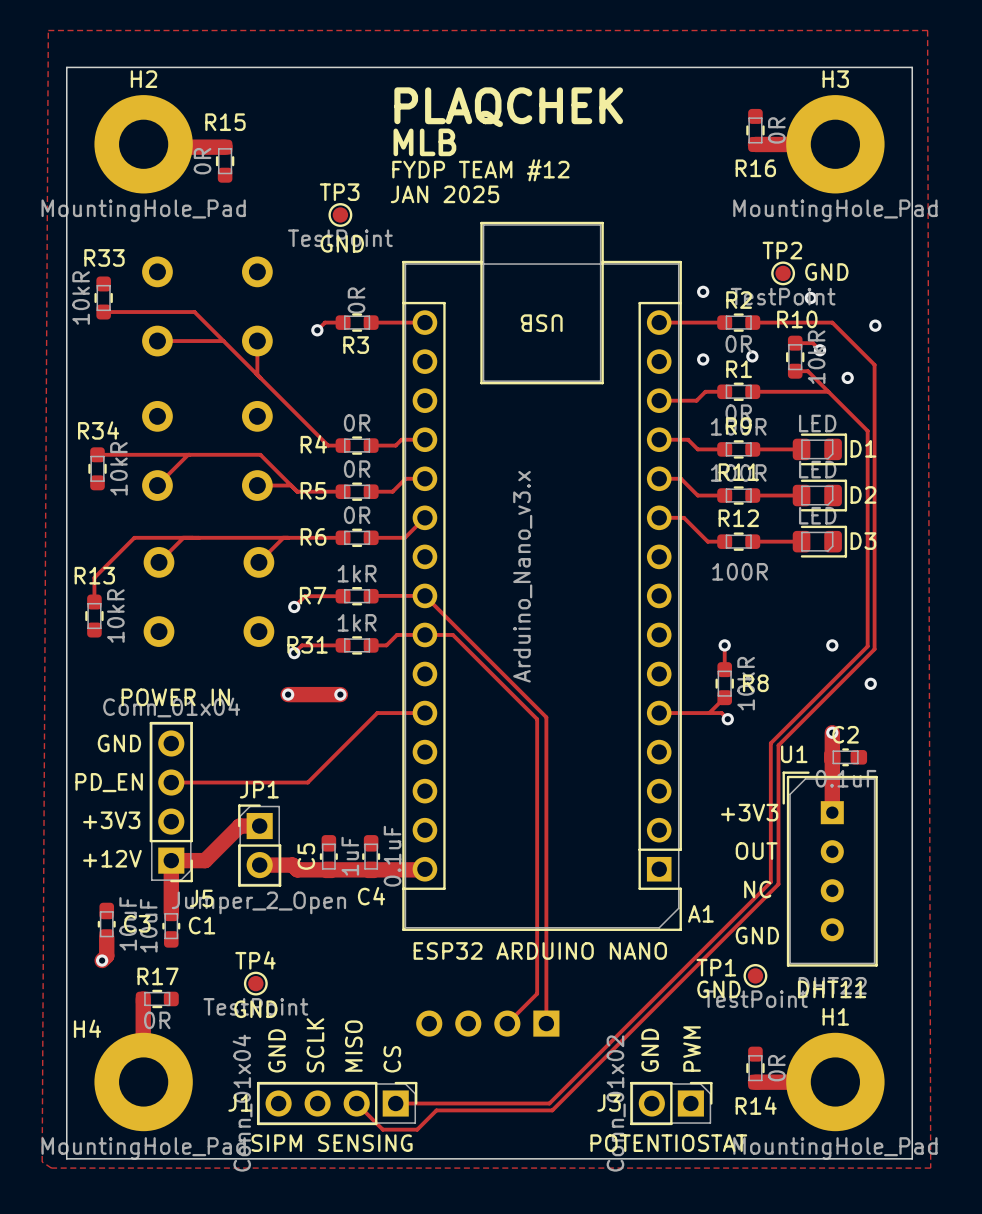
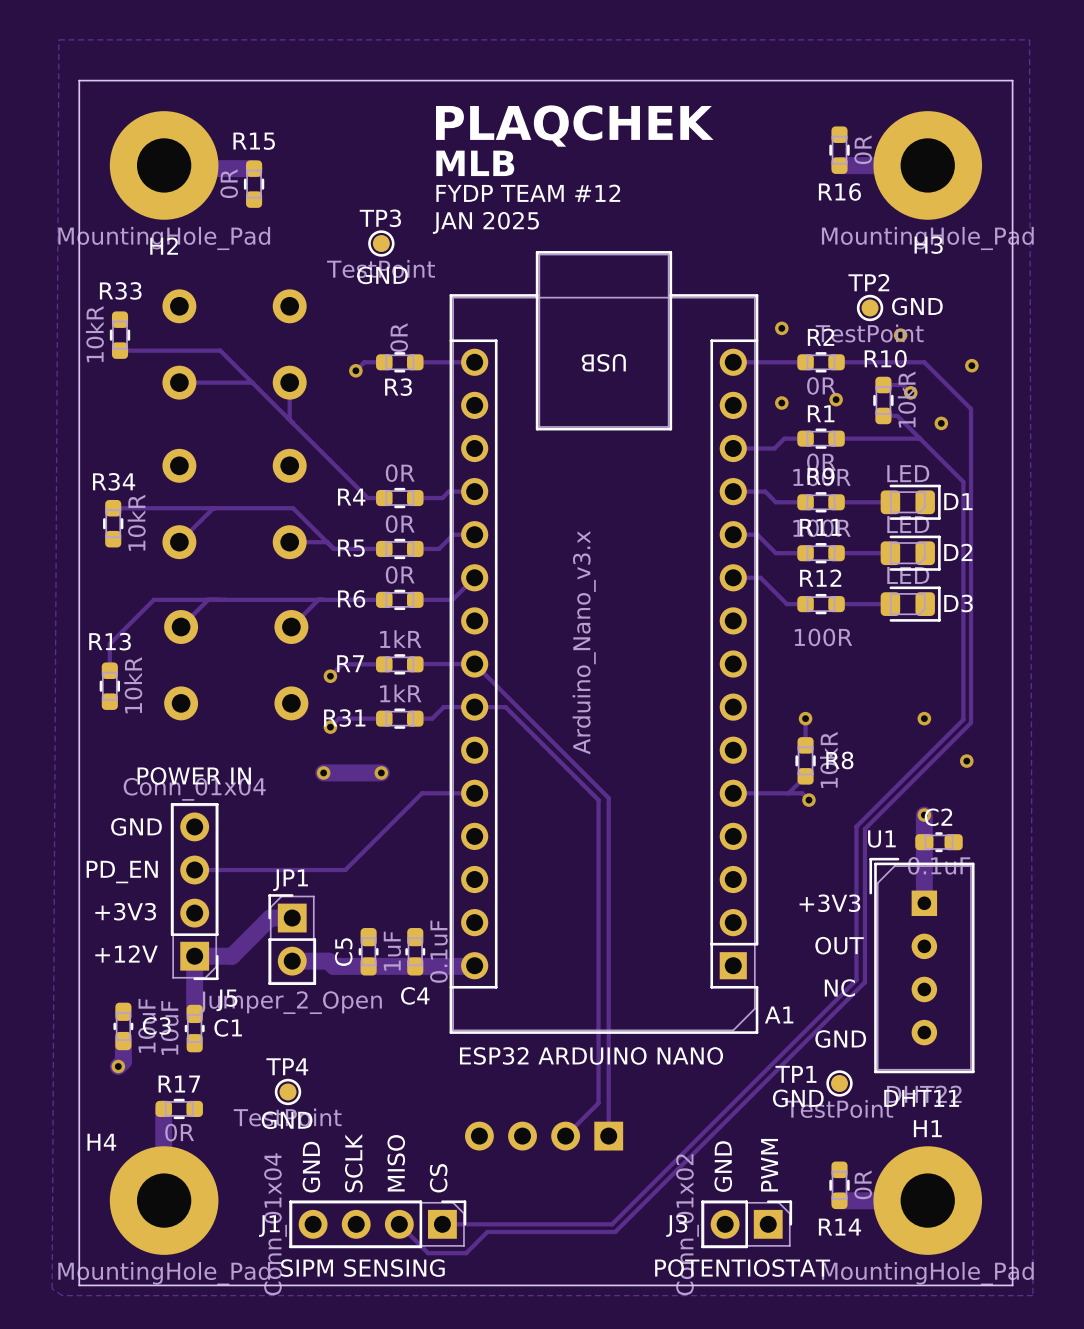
H2 name position: H2 (143, 79) -> H2 (164, 246)
H3 name position: H3 (835, 79) -> H3 (928, 245)

